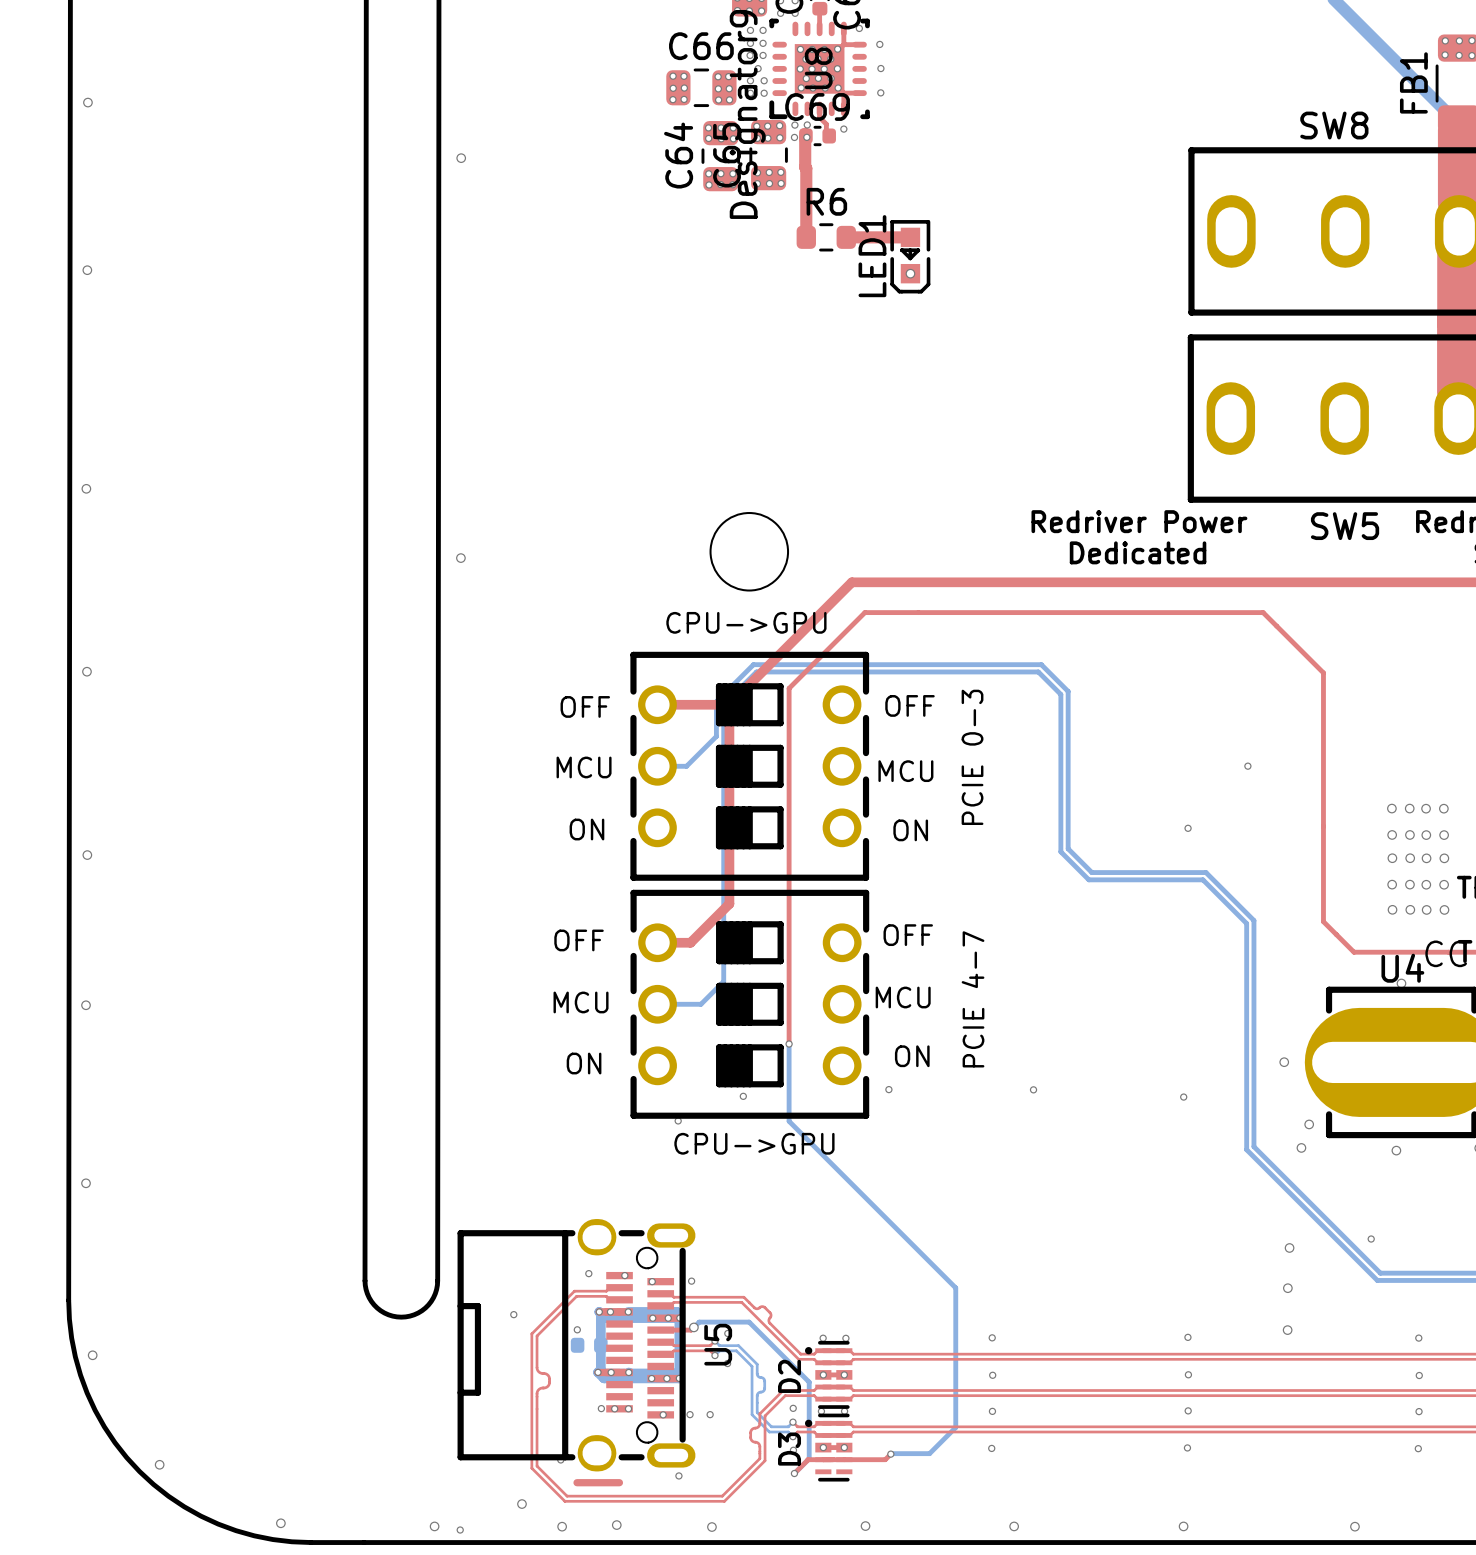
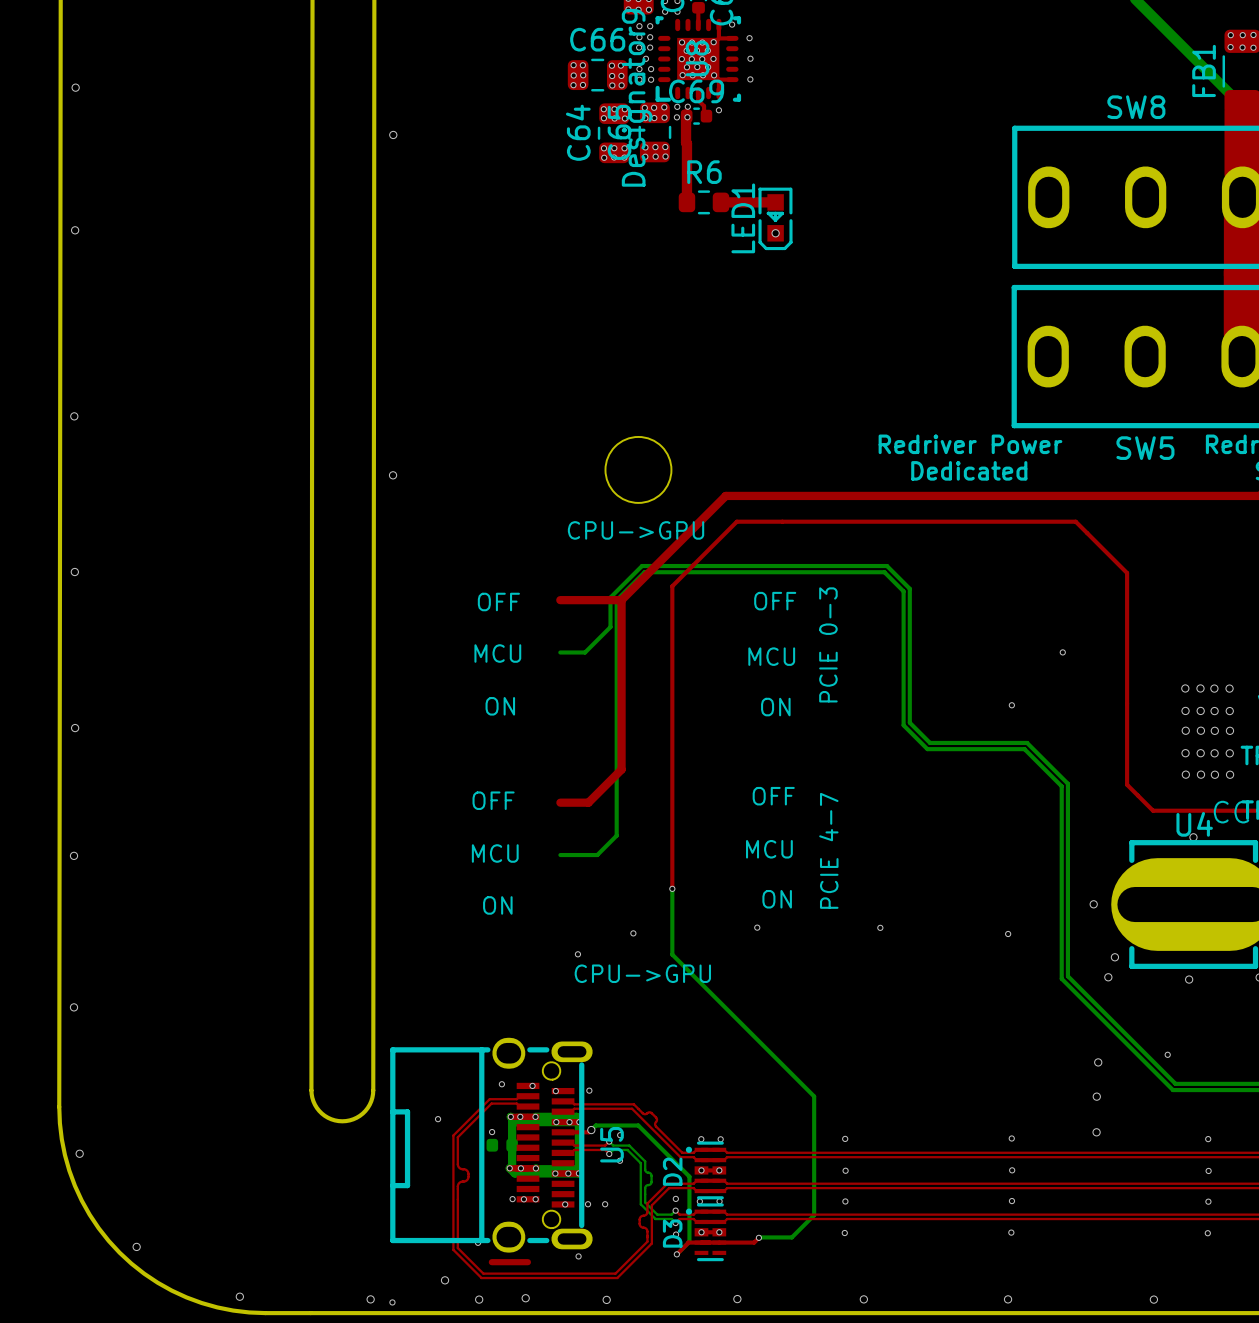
part: (749, 766) -> none
part: (749, 1004) -> none

